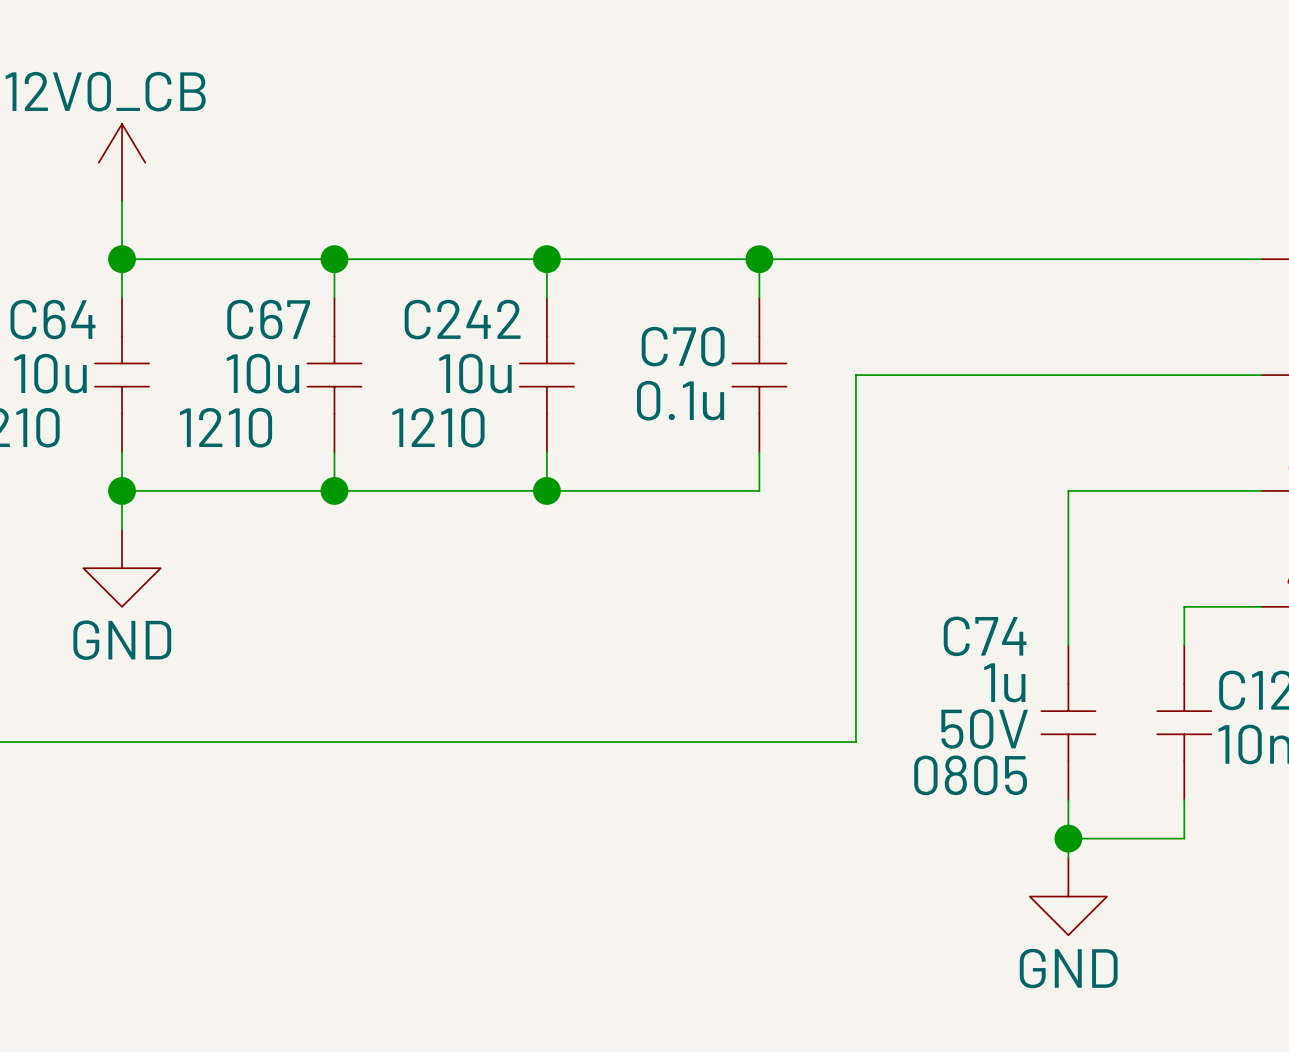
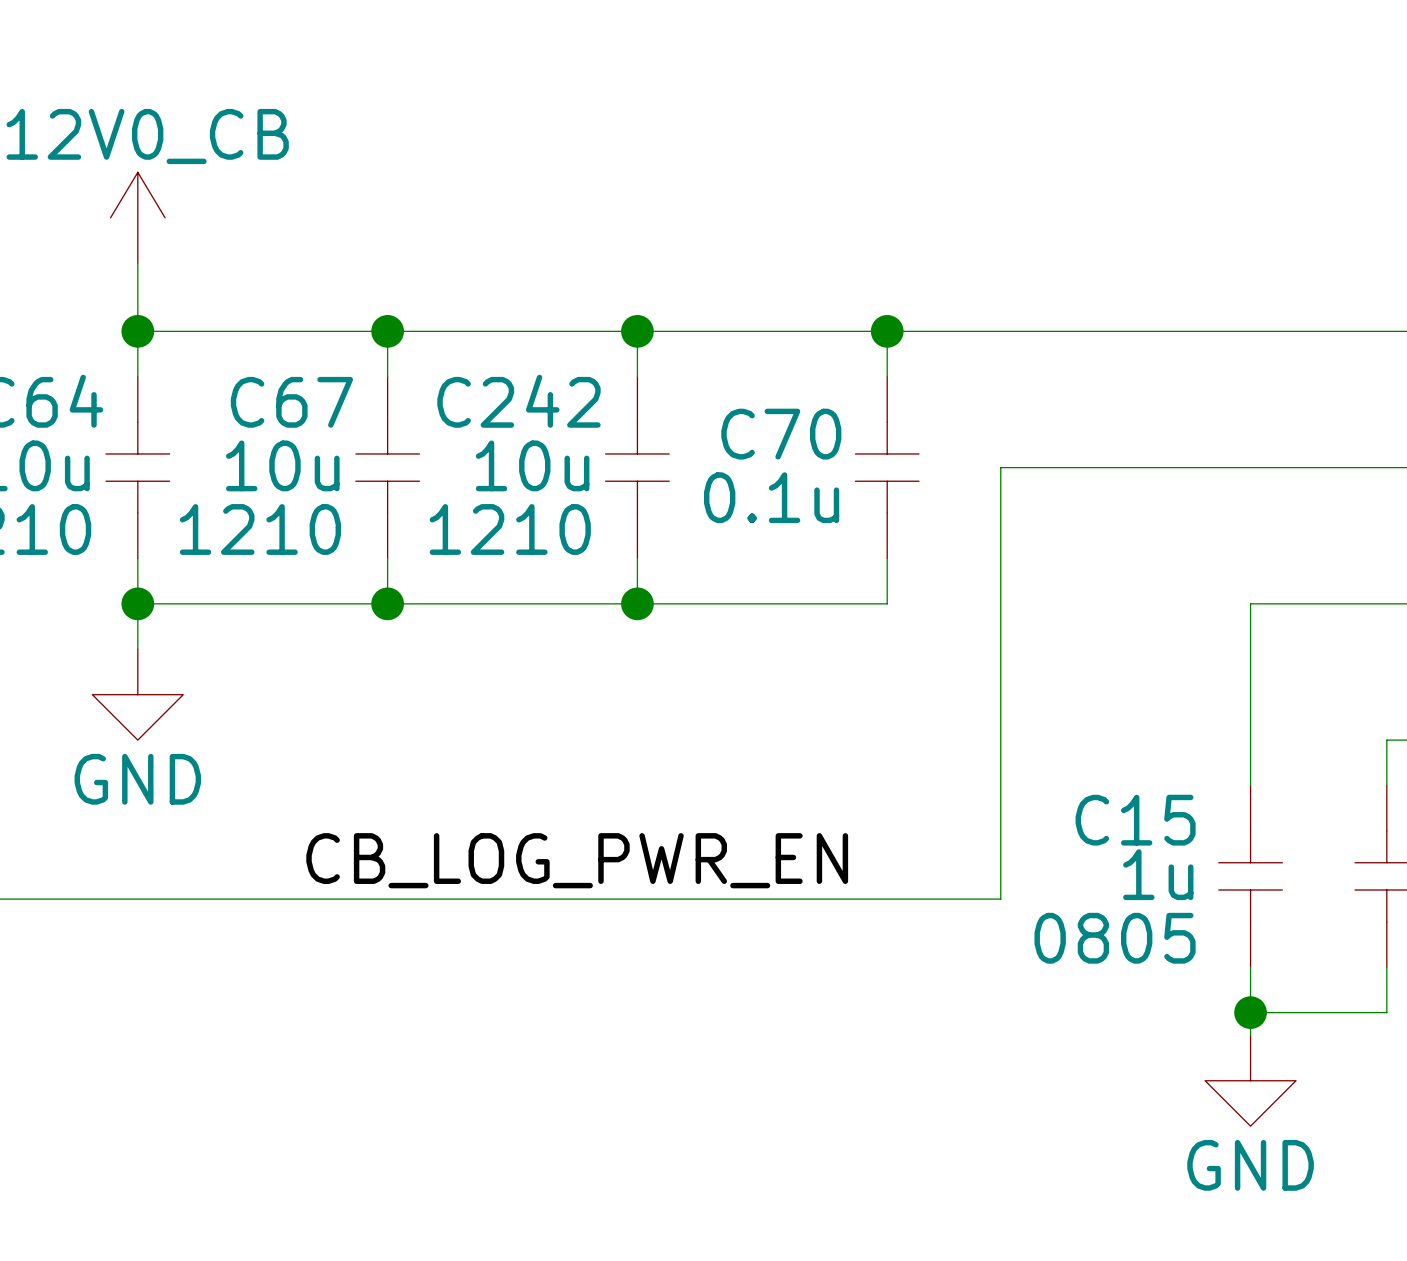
C74 name: C74 (985, 636) -> C15 (1135, 820)
C74 value position: 1u (1004, 682) -> 1u (1158, 874)
label: none -> CB_LOG_PWR_EN (577, 860)
C74 text: 50V (984, 729) -> none

